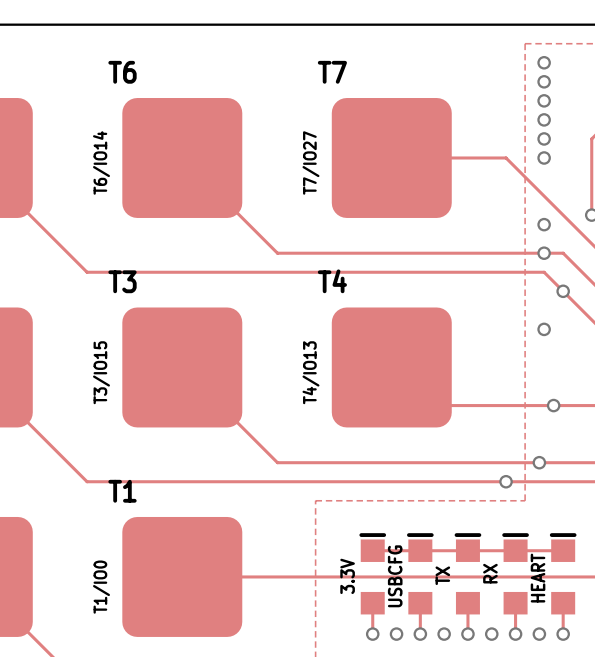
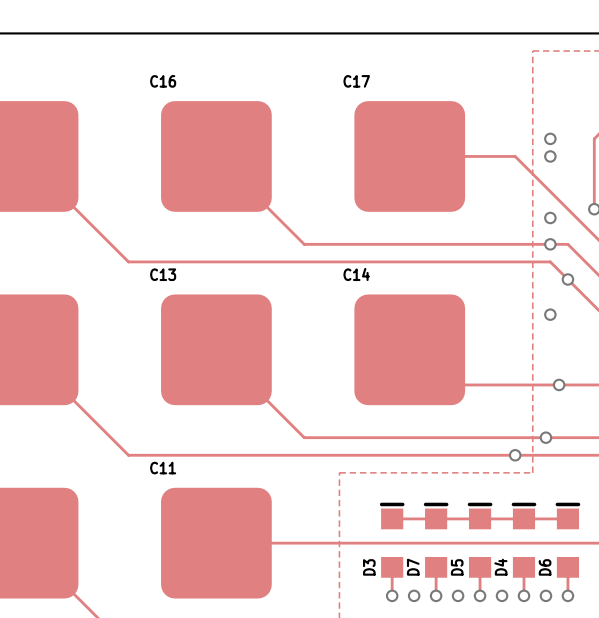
via: (544, 62) -> none
text: T6 (122, 72) -> none
text: T7 (332, 72) -> none
C16 name: none -> C16 (163, 81)
C17 name: none -> C17 (356, 81)
via: (544, 81) -> none
via: (544, 100) -> none
via: (544, 119) -> none
text: T6/IO14 (101, 162) -> none
text: T7/IO27 (310, 162) -> none
text: T3 (122, 281) -> none
text: T4 (332, 281) -> none
C14 name: none -> C14 (356, 274)
C13 name: none -> C13 (163, 274)
text: T3/IO15 (101, 372) -> none
text: T4/IO13 (310, 372) -> none
text: T1 (122, 491) -> none
C11 name: none -> C11 (163, 468)
text: RX (490, 573) -> none
text: TX (442, 575) -> none
text: 3.3V (347, 576) -> none
text: USBCFG (395, 576) -> none
text: HEART (538, 578) -> none
text: T1/IO0 (101, 587) -> none
D3 name: none -> D3 (369, 567)
D7 name: none -> D7 (413, 567)
D5 name: none -> D5 (457, 567)
D4 name: none -> D4 (500, 567)
D6 name: none -> D6 (545, 567)

